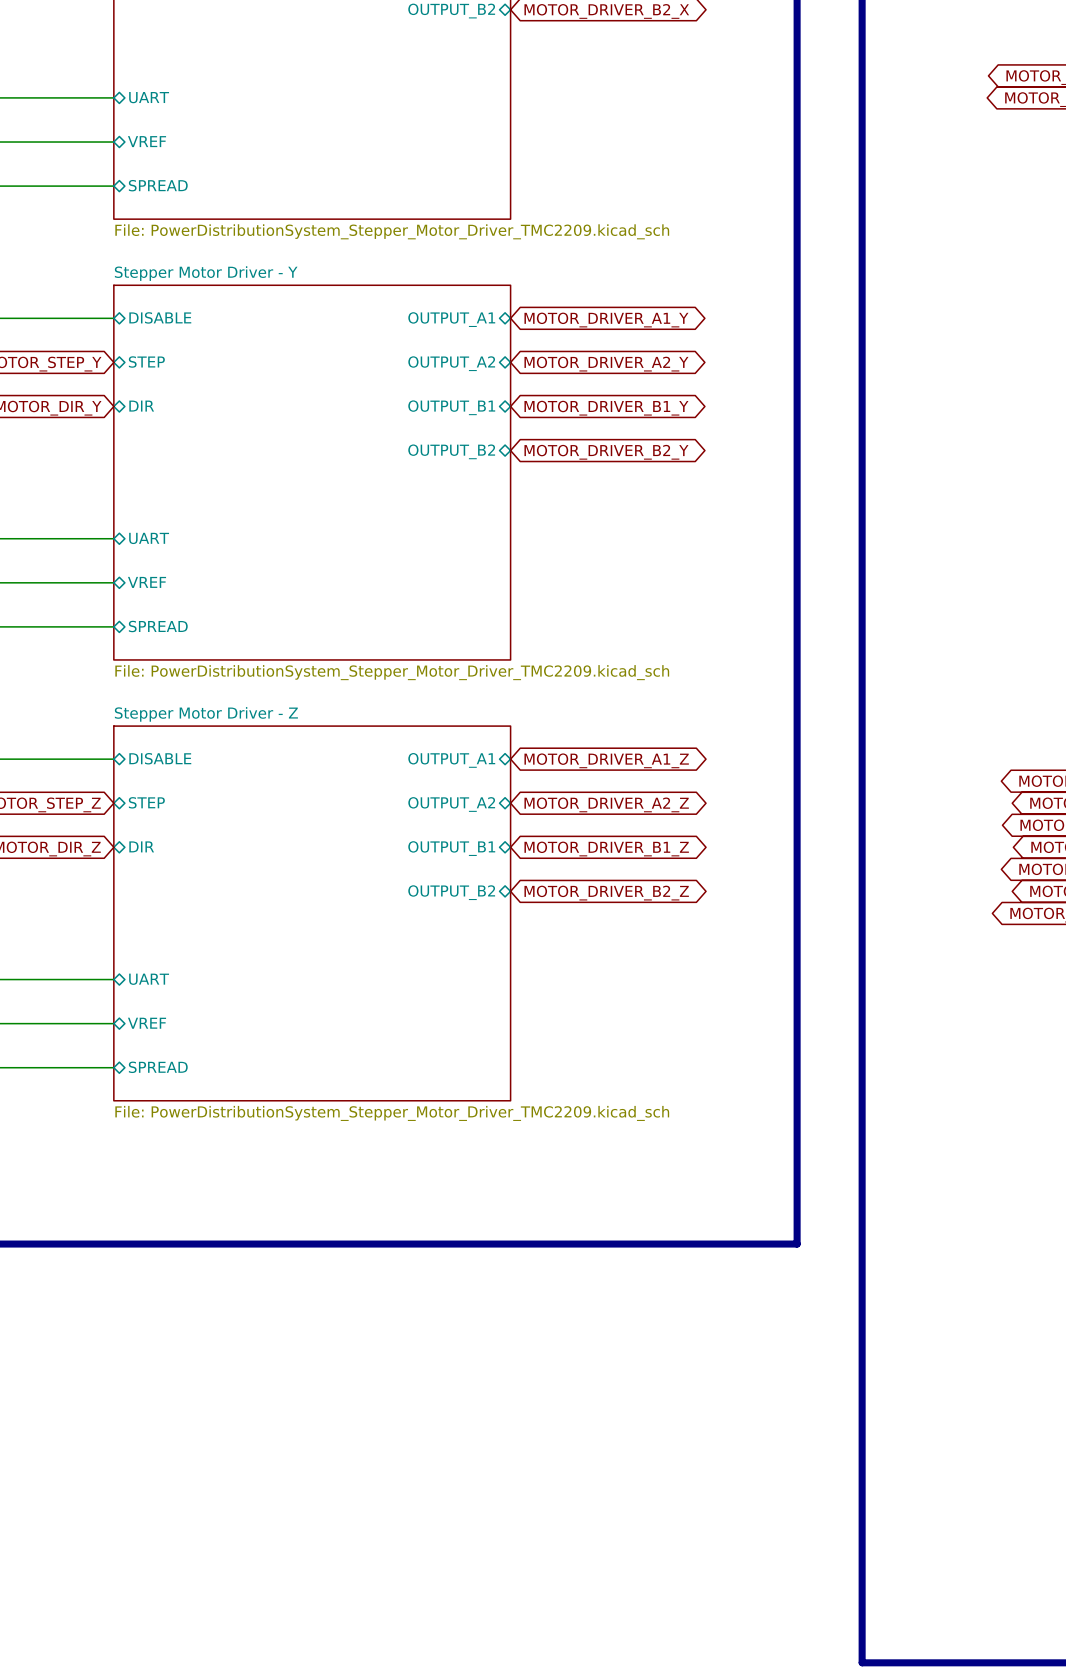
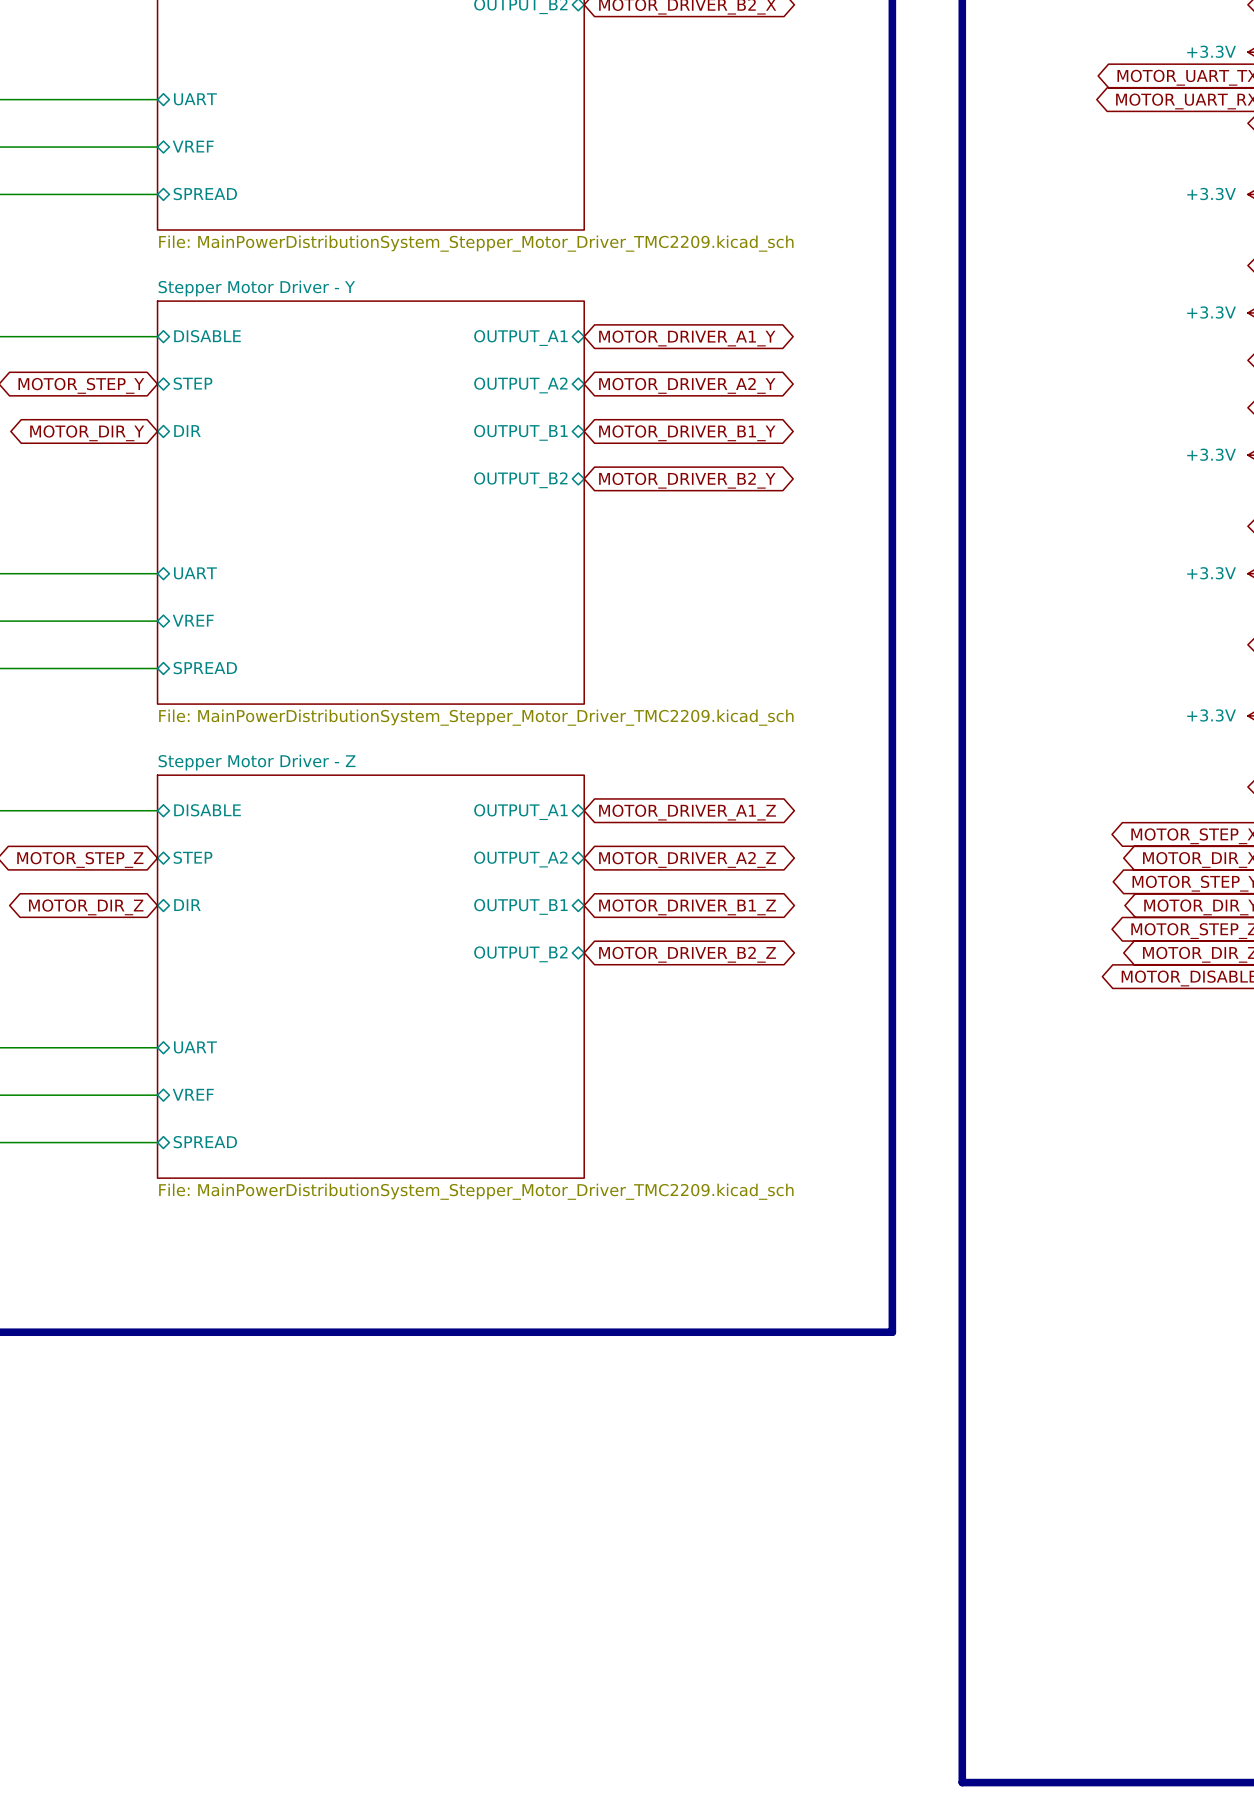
sheet value: File: PowerDistributionSystem_Stepper_Motor_Driver_TMC2209.kicad_sch (392, 231) -> File: MainPowerDistributionSystem_Stepper_Motor_Driver_TMC2209.kicad_sch (476, 243)
sheet Stepper Motor Driver - Y value: File: PowerDistributionSystem_Stepper_Motor_Driver_TMC2209.kicad_sch (392, 672) -> File: MainPowerDistributionSystem_Stepper_Motor_Driver_TMC2209.kicad_sch (476, 717)
sheet Stepper Motor Driver - Z value: File: PowerDistributionSystem_Stepper_Motor_Driver_TMC2209.kicad_sch (392, 1113) -> File: MainPowerDistributionSystem_Stepper_Motor_Driver_TMC2209.kicad_sch (476, 1191)

